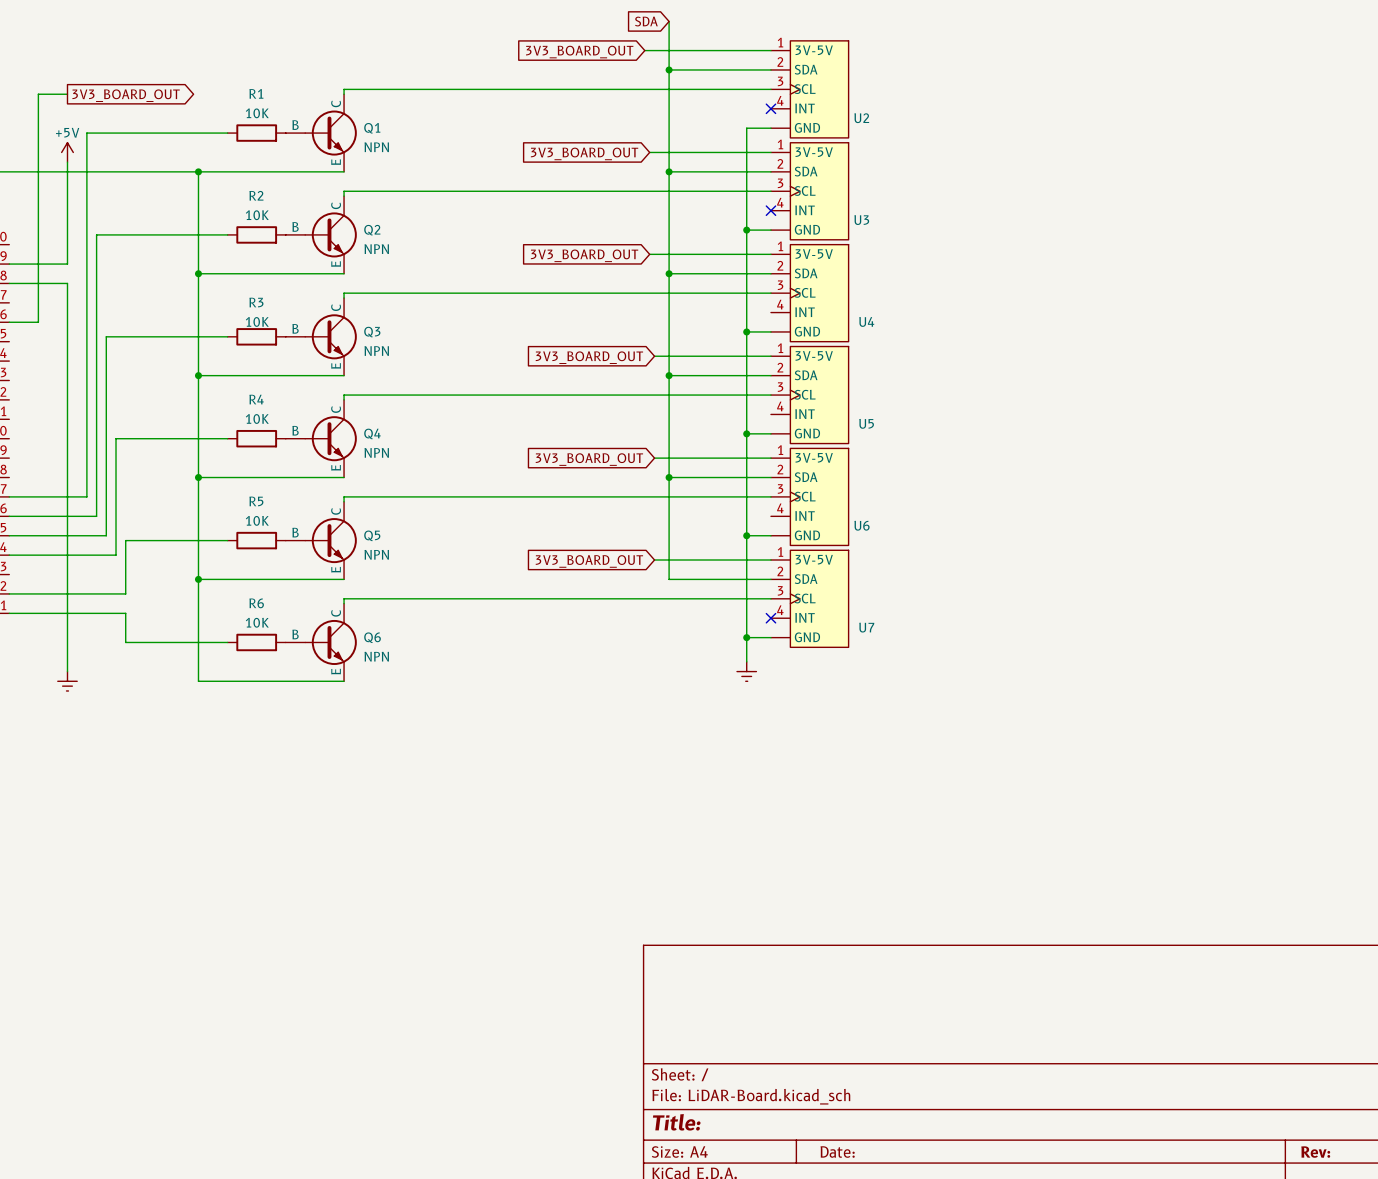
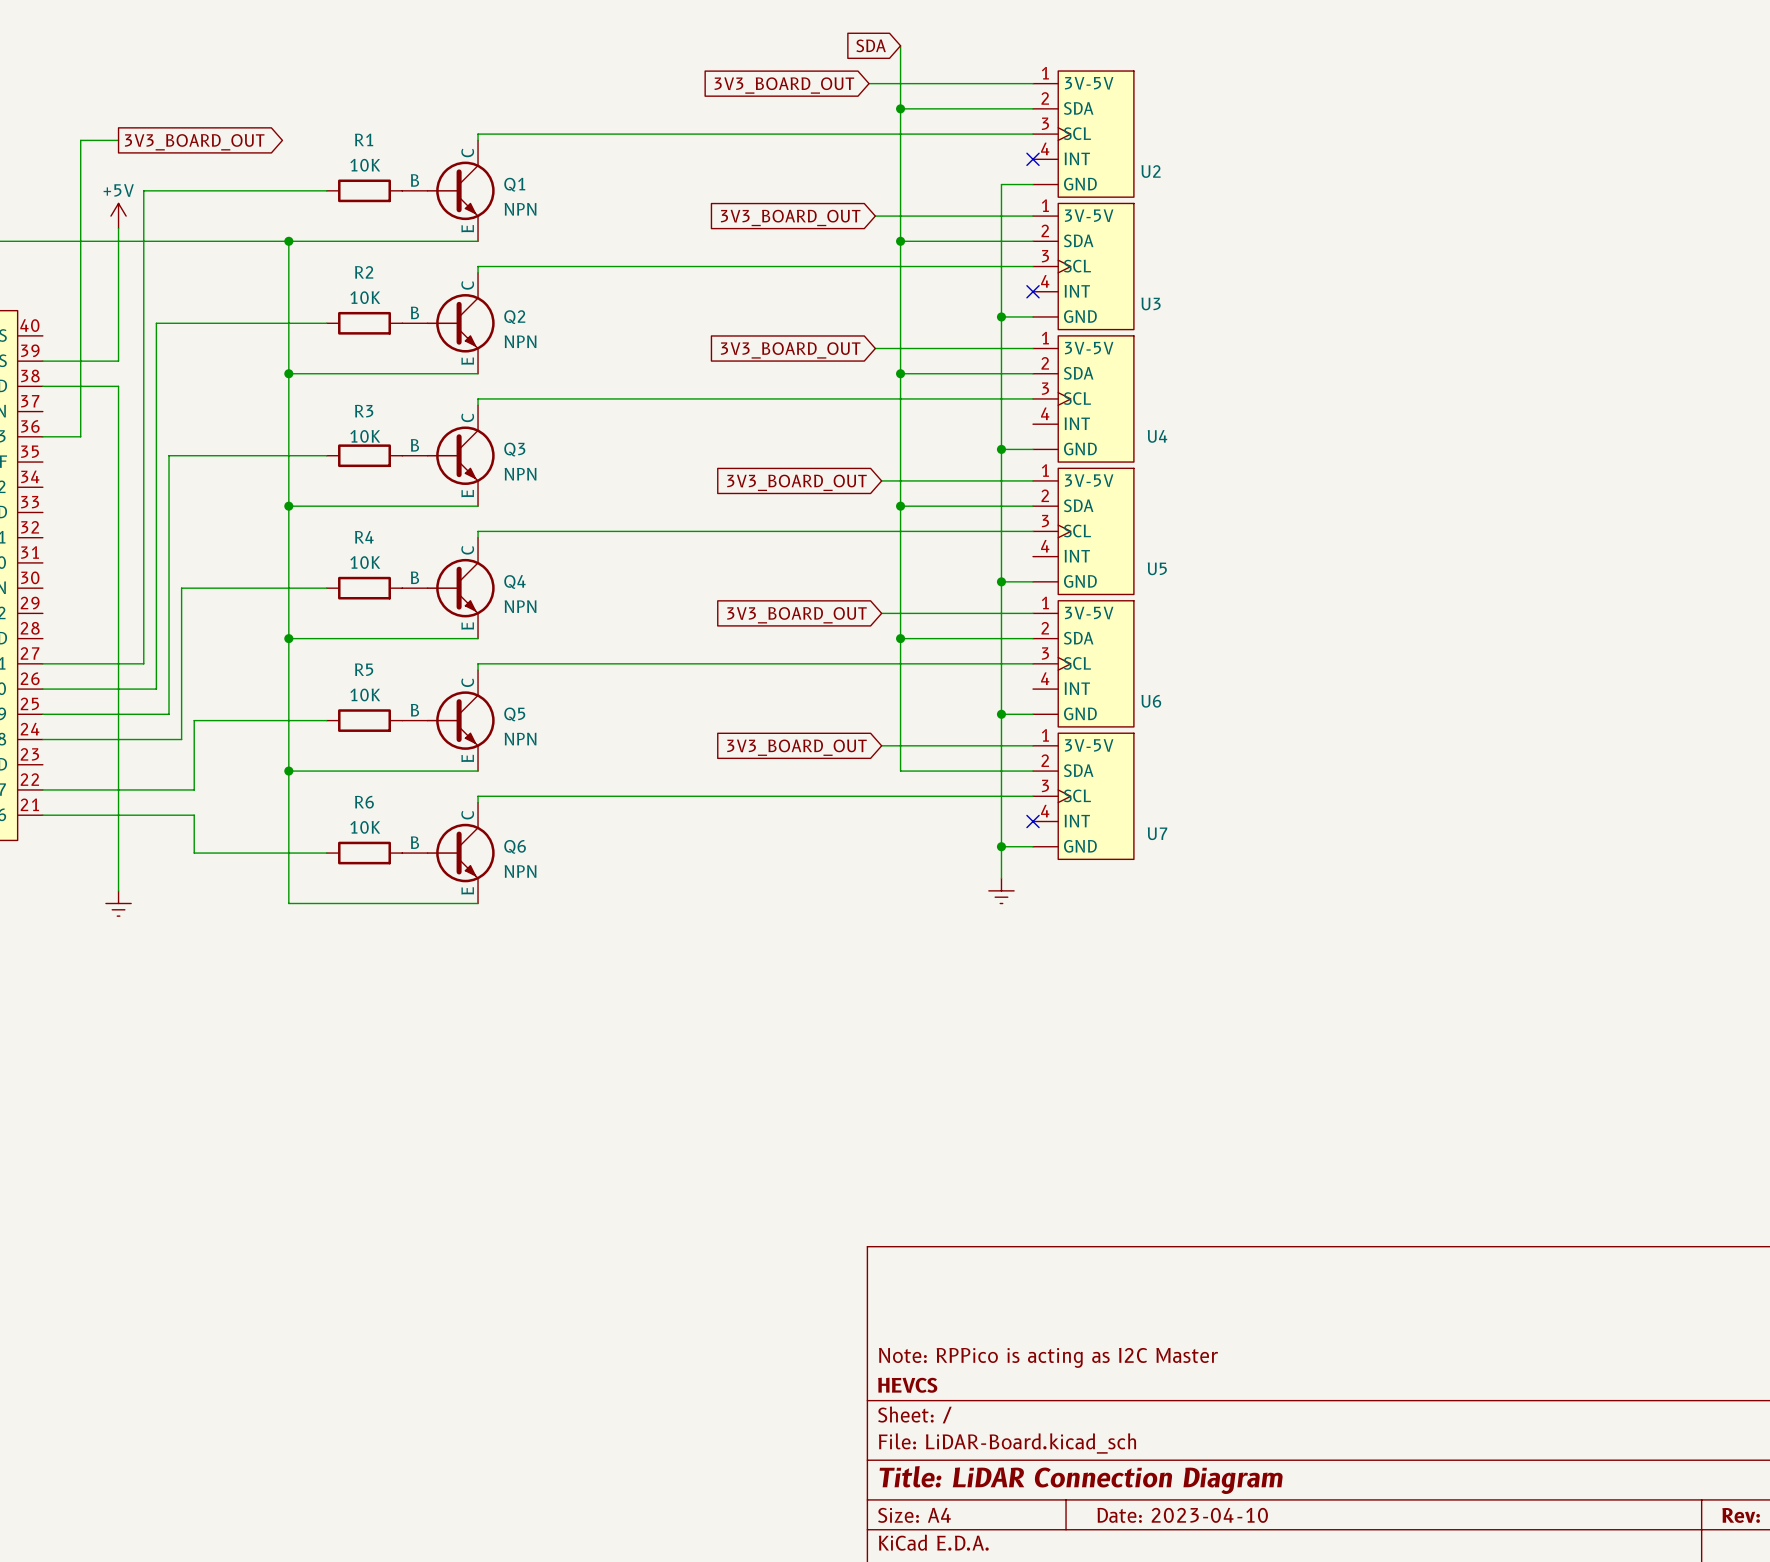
title block: none -> Note: RPPico is acting as I2C Master (1048, 1357)
title block: none -> HEVCS (907, 1385)
title block: Title: (676, 1122) -> Title: LiDAR Connection Diagram (1081, 1480)
title block: Date: (837, 1152) -> Date: 2023-04-10 (1182, 1515)

